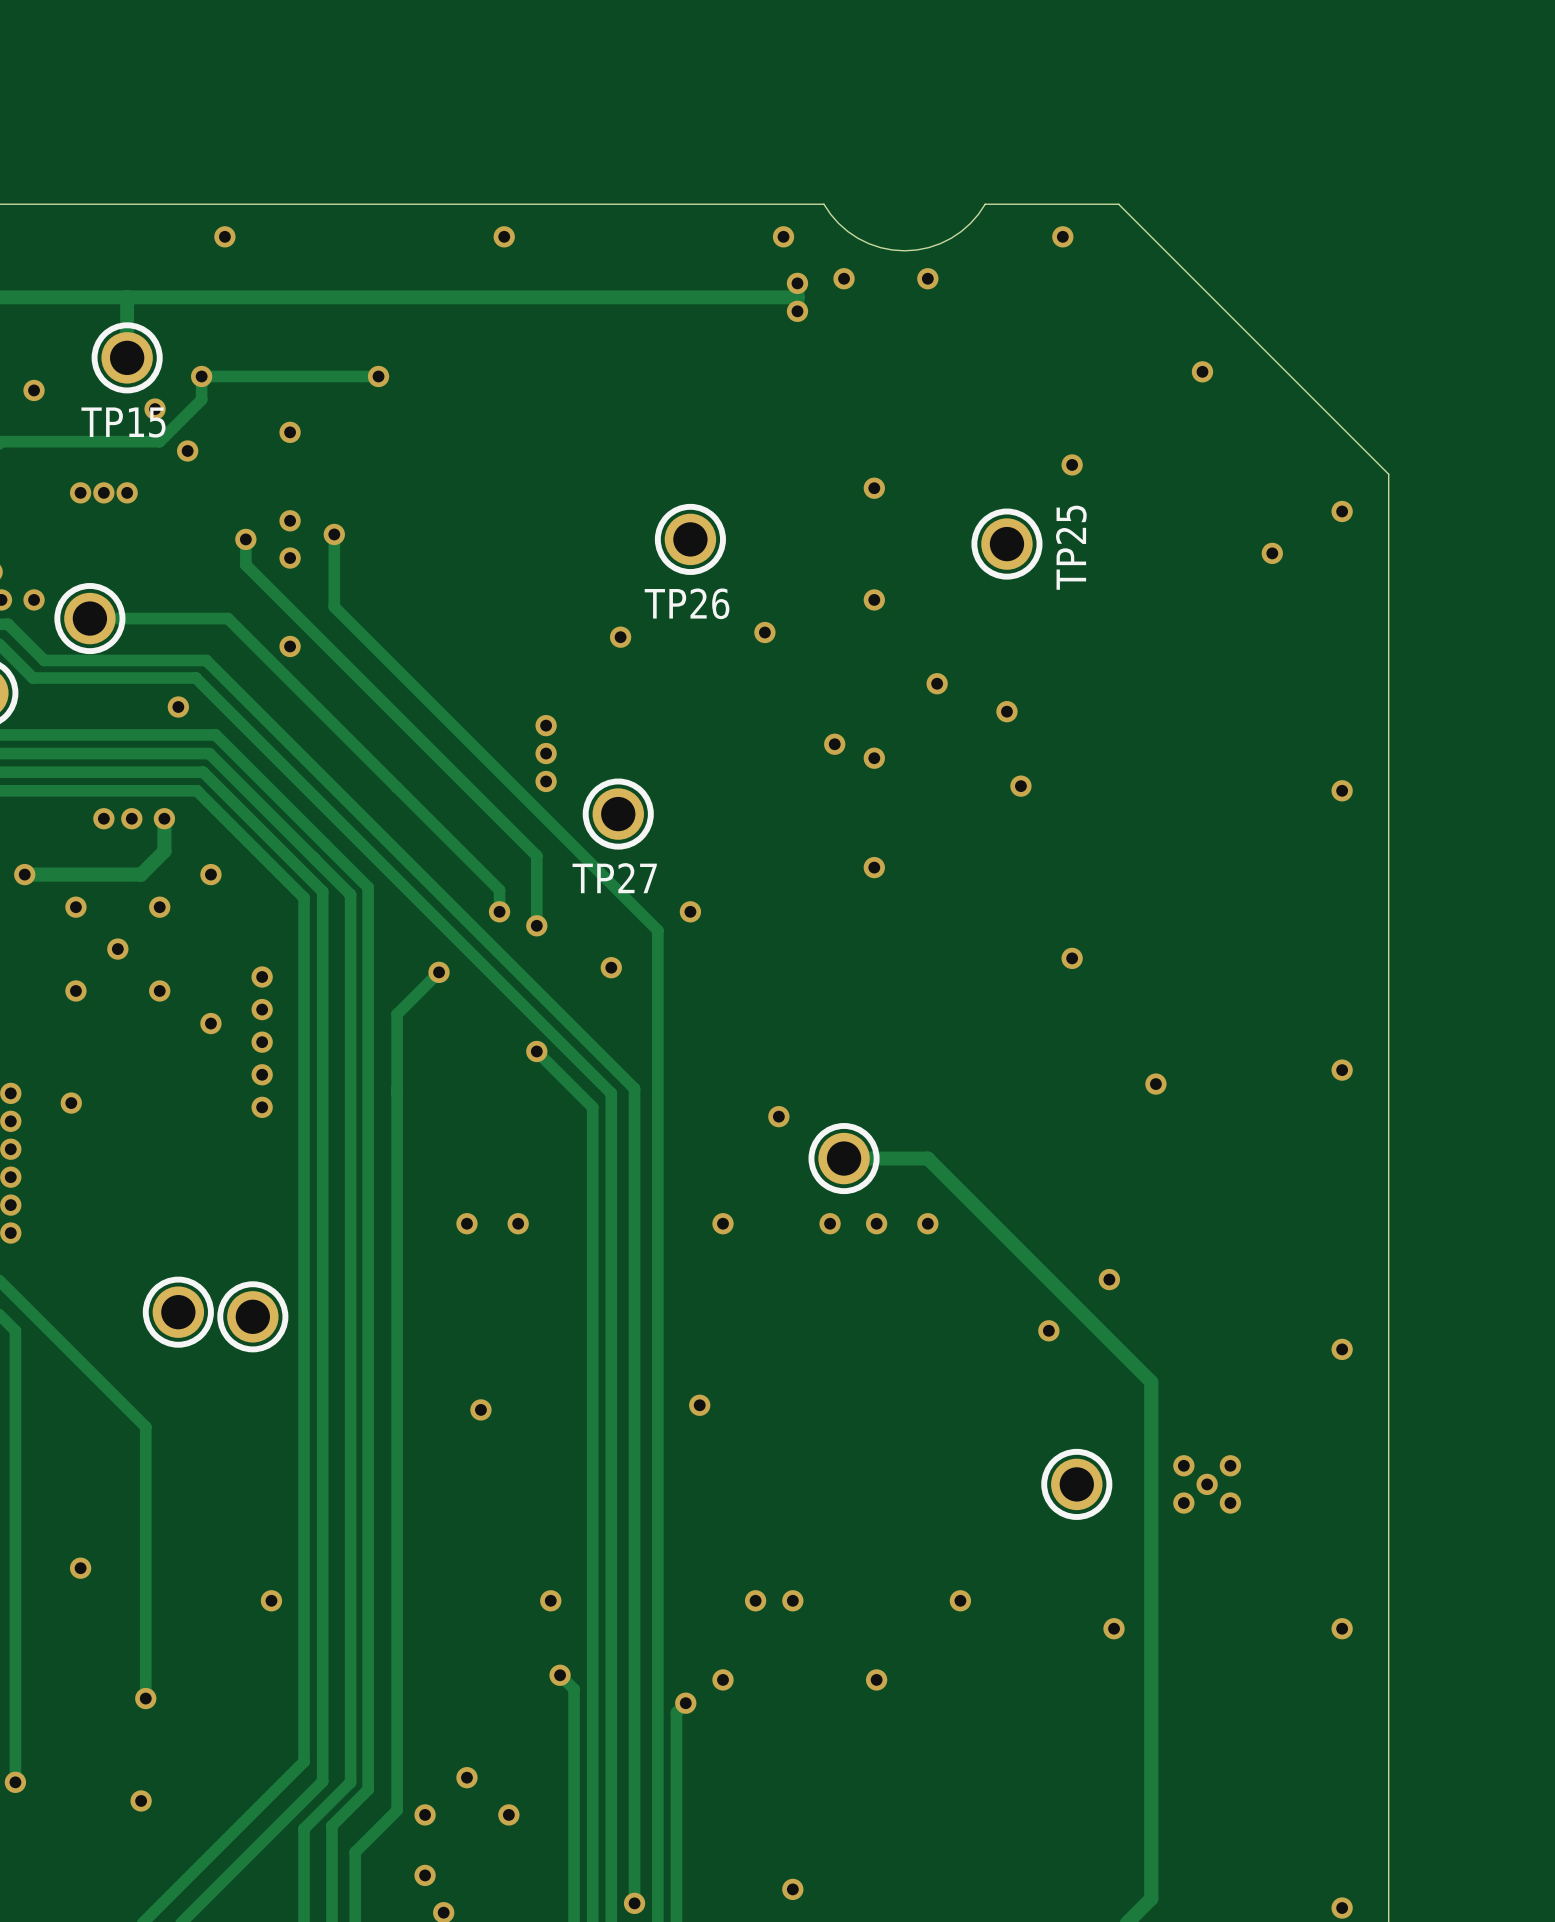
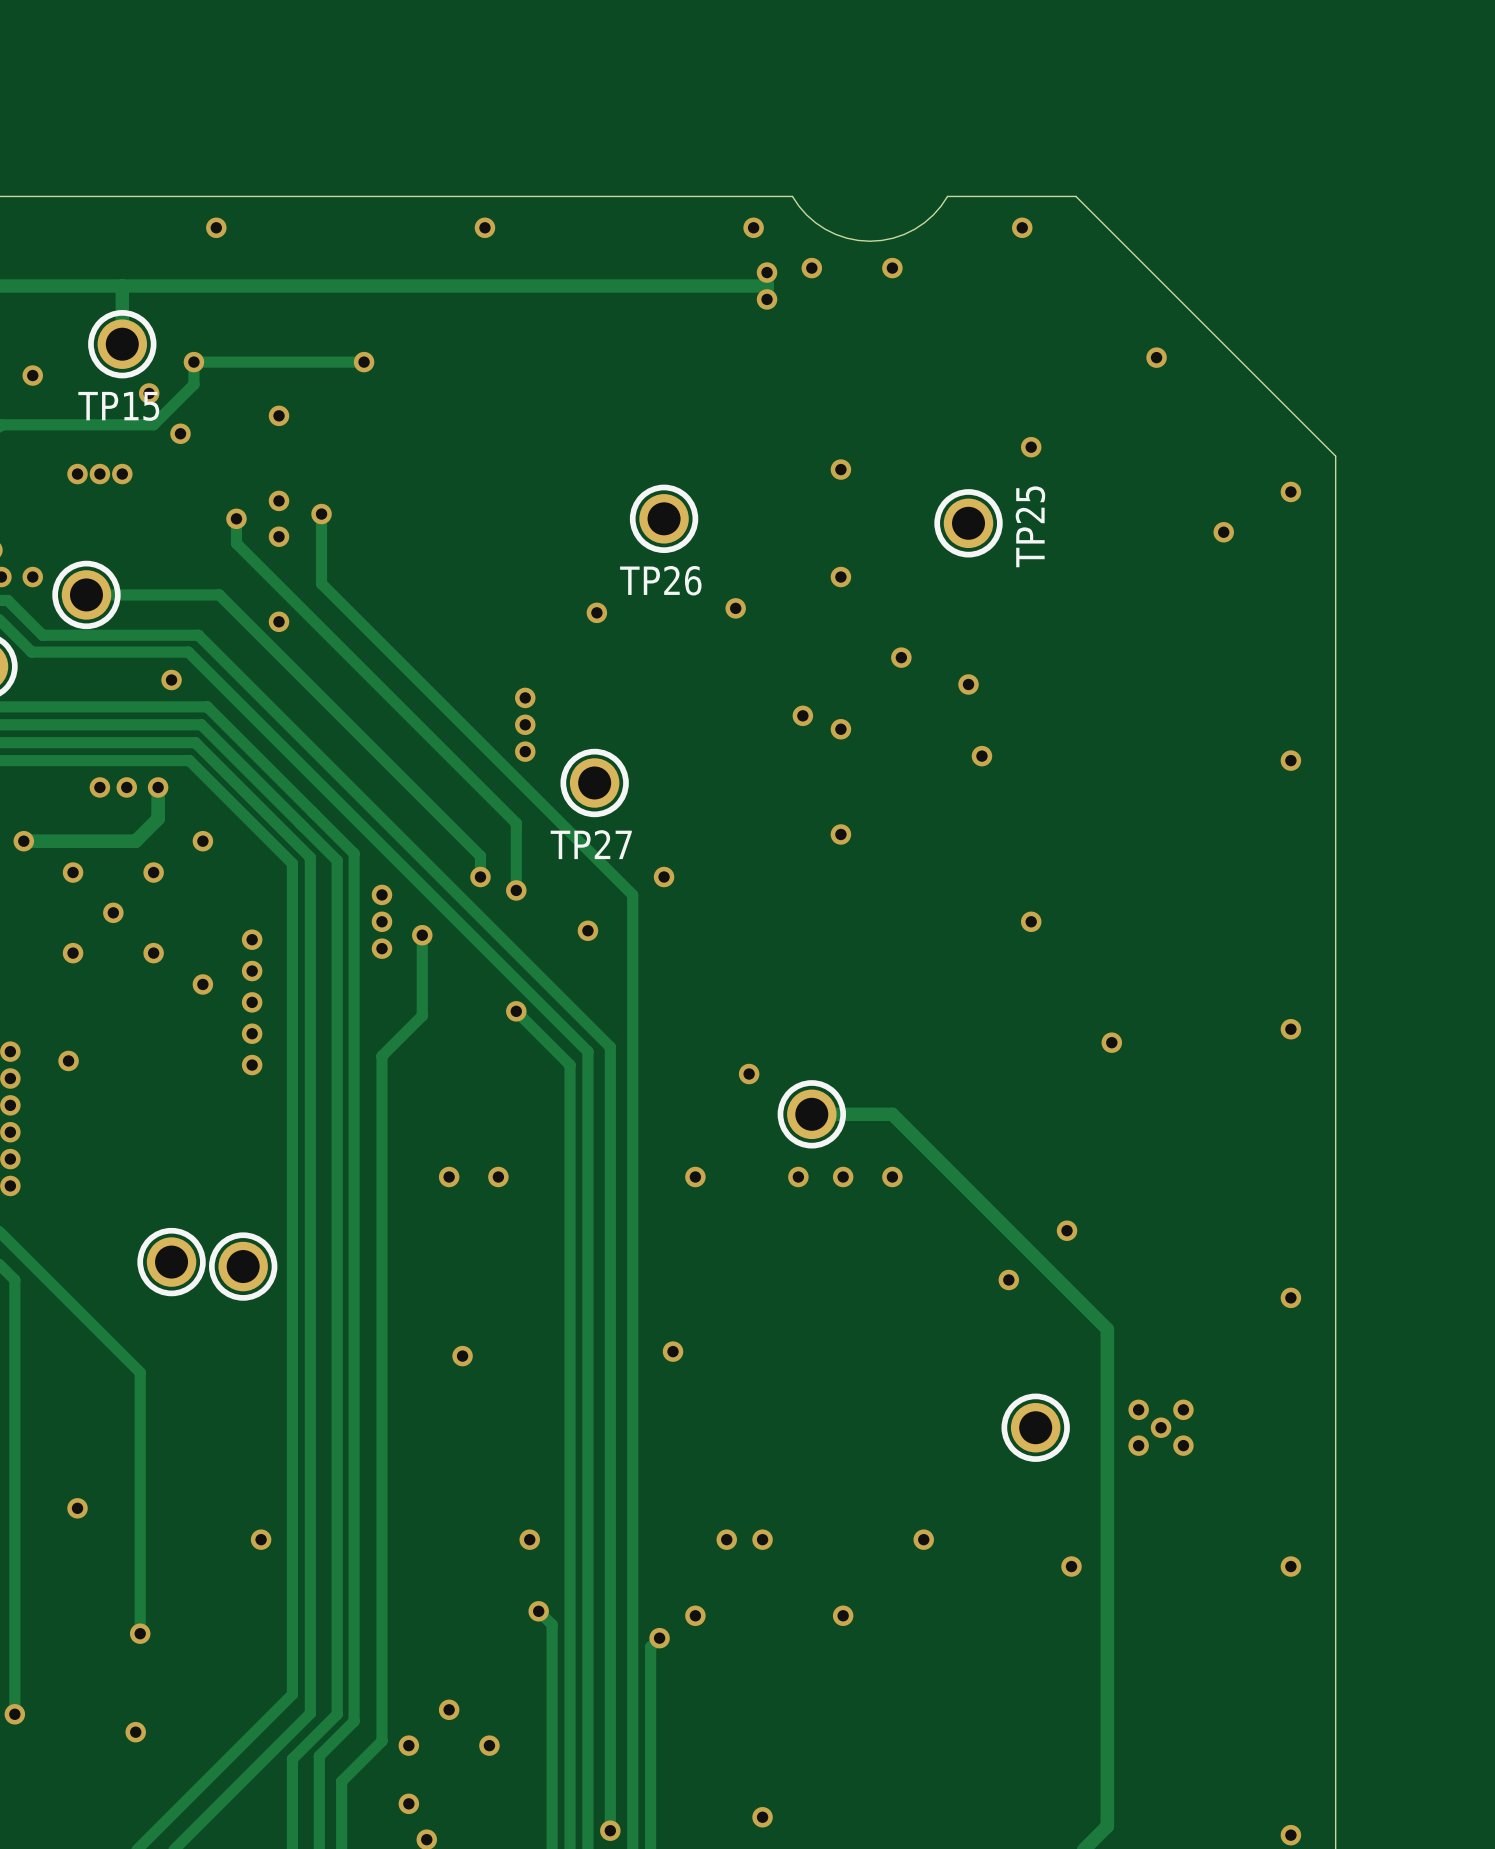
via: none -> (381, 894)
via: none -> (381, 921)
track: (439, 972) (397, 1014) (397, 1098) -> (422, 935) (422, 1015) (381, 1056)
via: none -> (381, 948)

